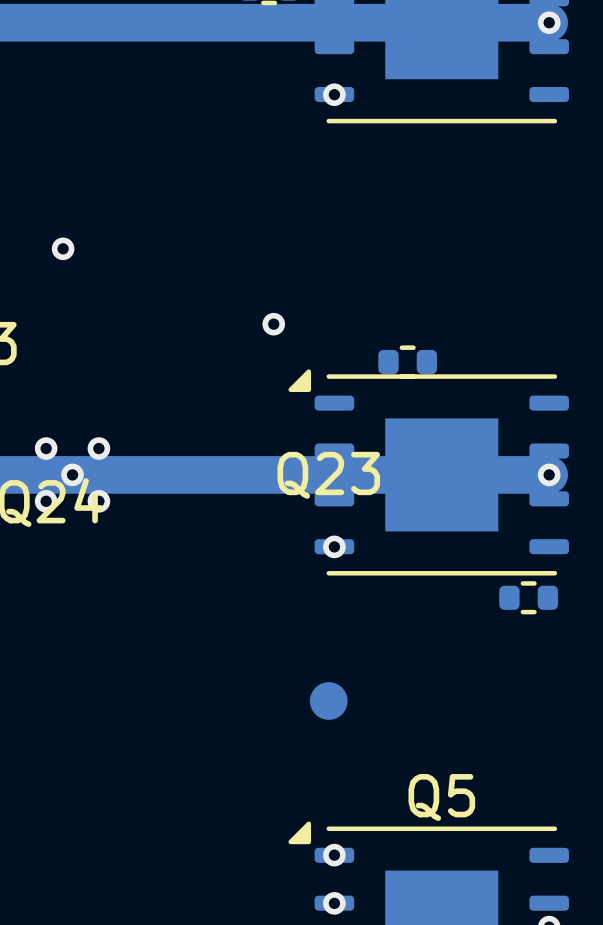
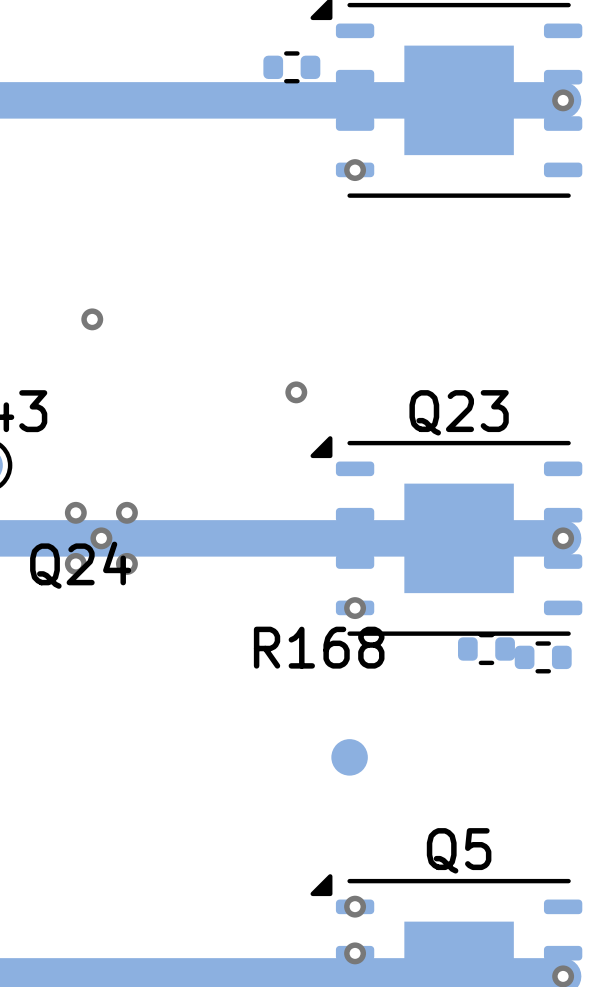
part: (407, 361) -> none
Q23 name position: Q23 (328, 475) -> Q23 (459, 412)
R168: none -> (486, 649)

